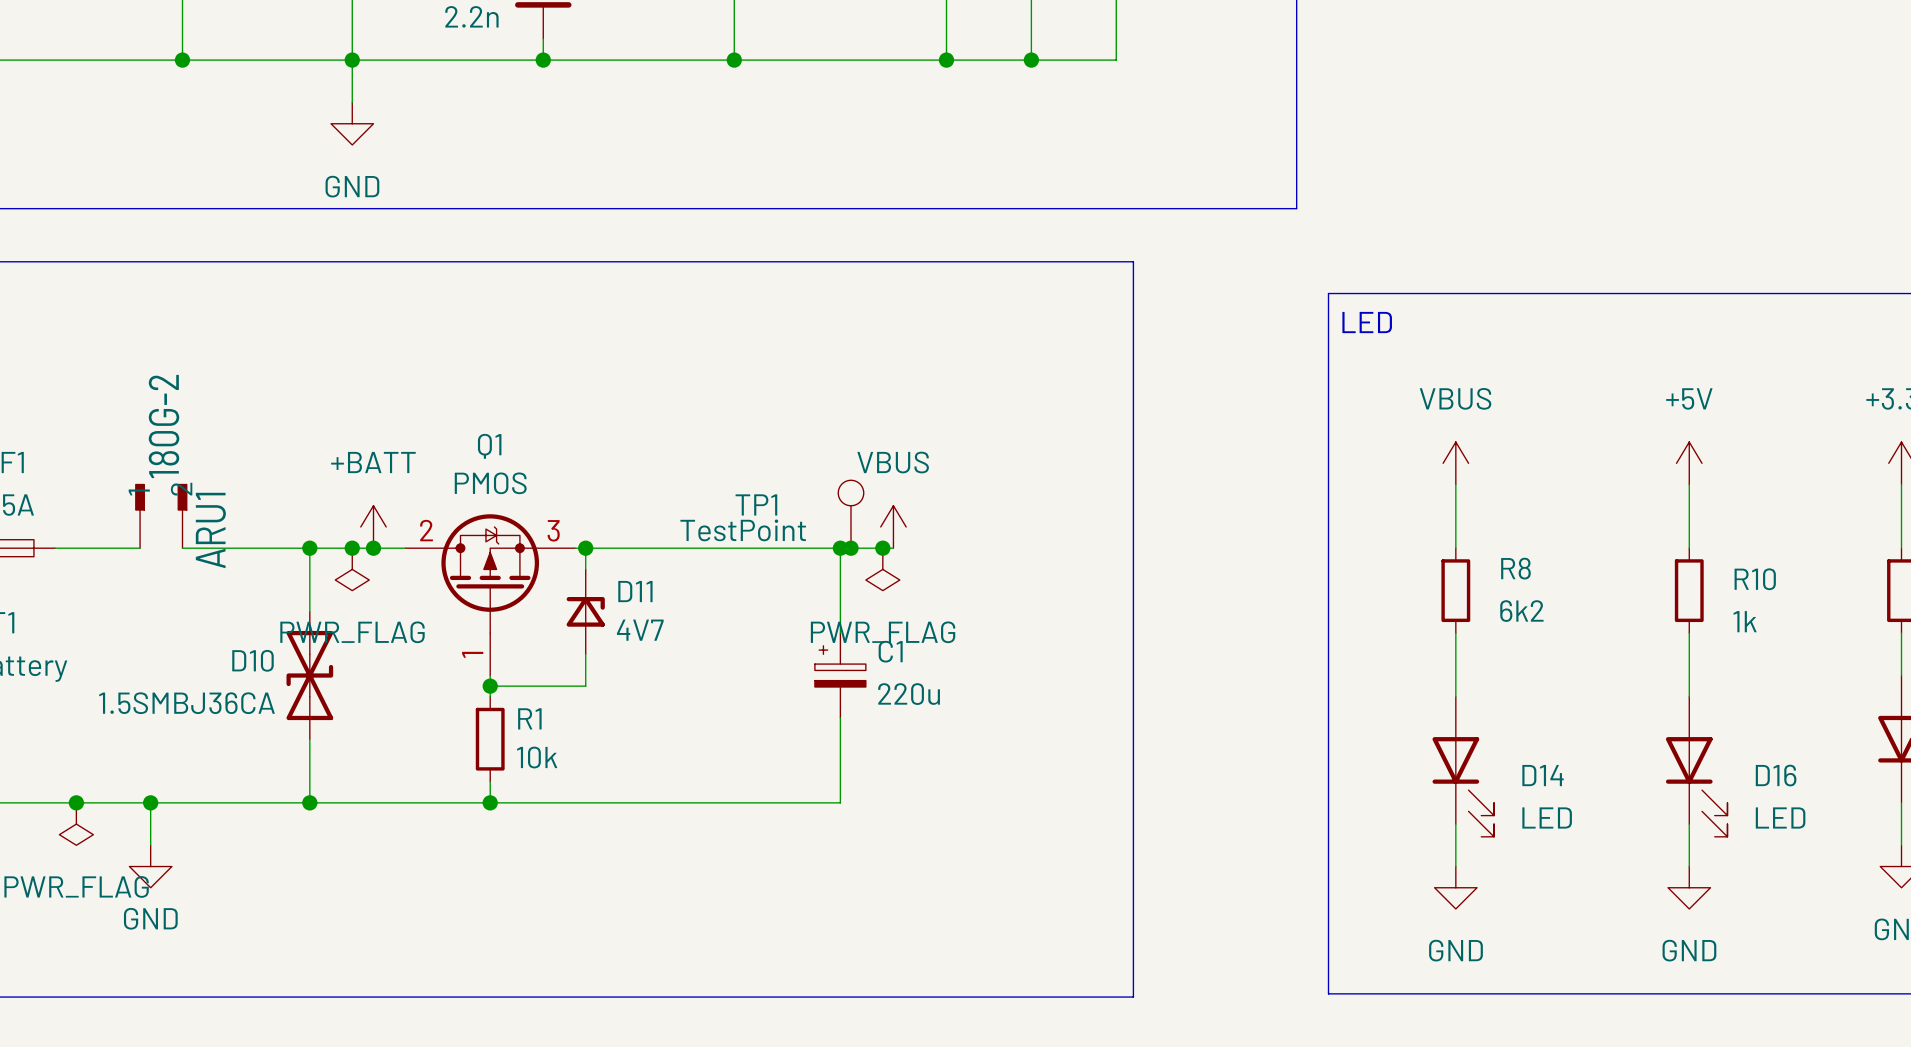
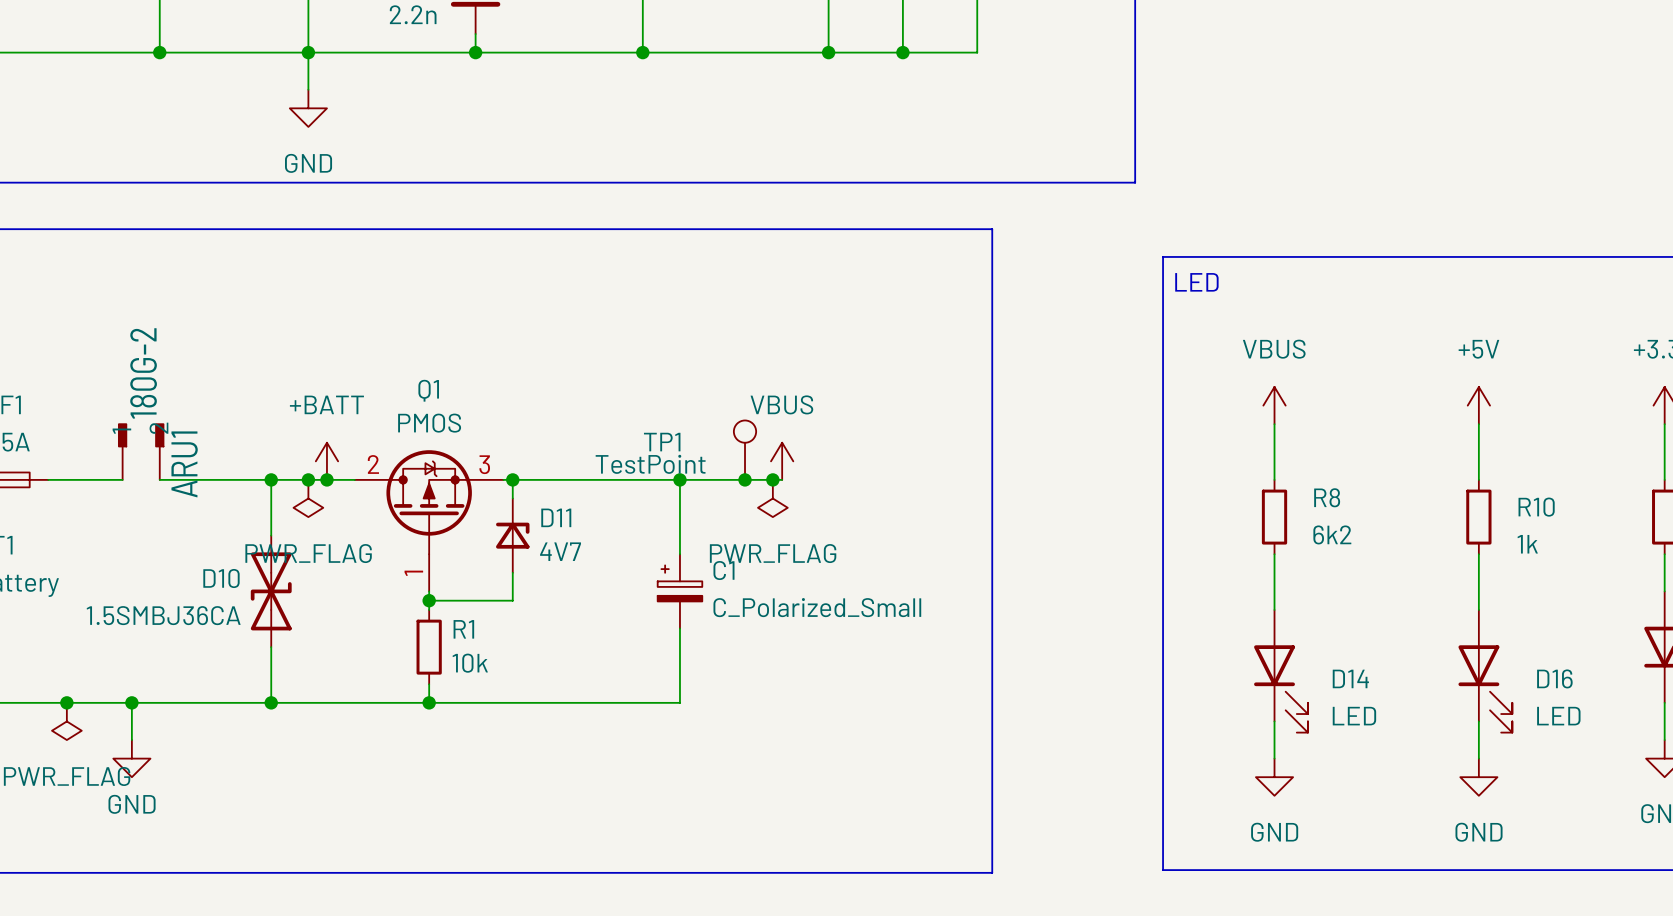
wire: (840, 548) (840, 633) -> (679, 479) (679, 554)
junction position: (840, 548) -> (679, 479)
C1 position: (840, 675) -> (679, 591)
C1 value: 220u (909, 694) -> C_Polarized_Small (817, 607)
wire: (840, 717) (840, 802) (776, 802) -> (679, 628) (679, 702)

